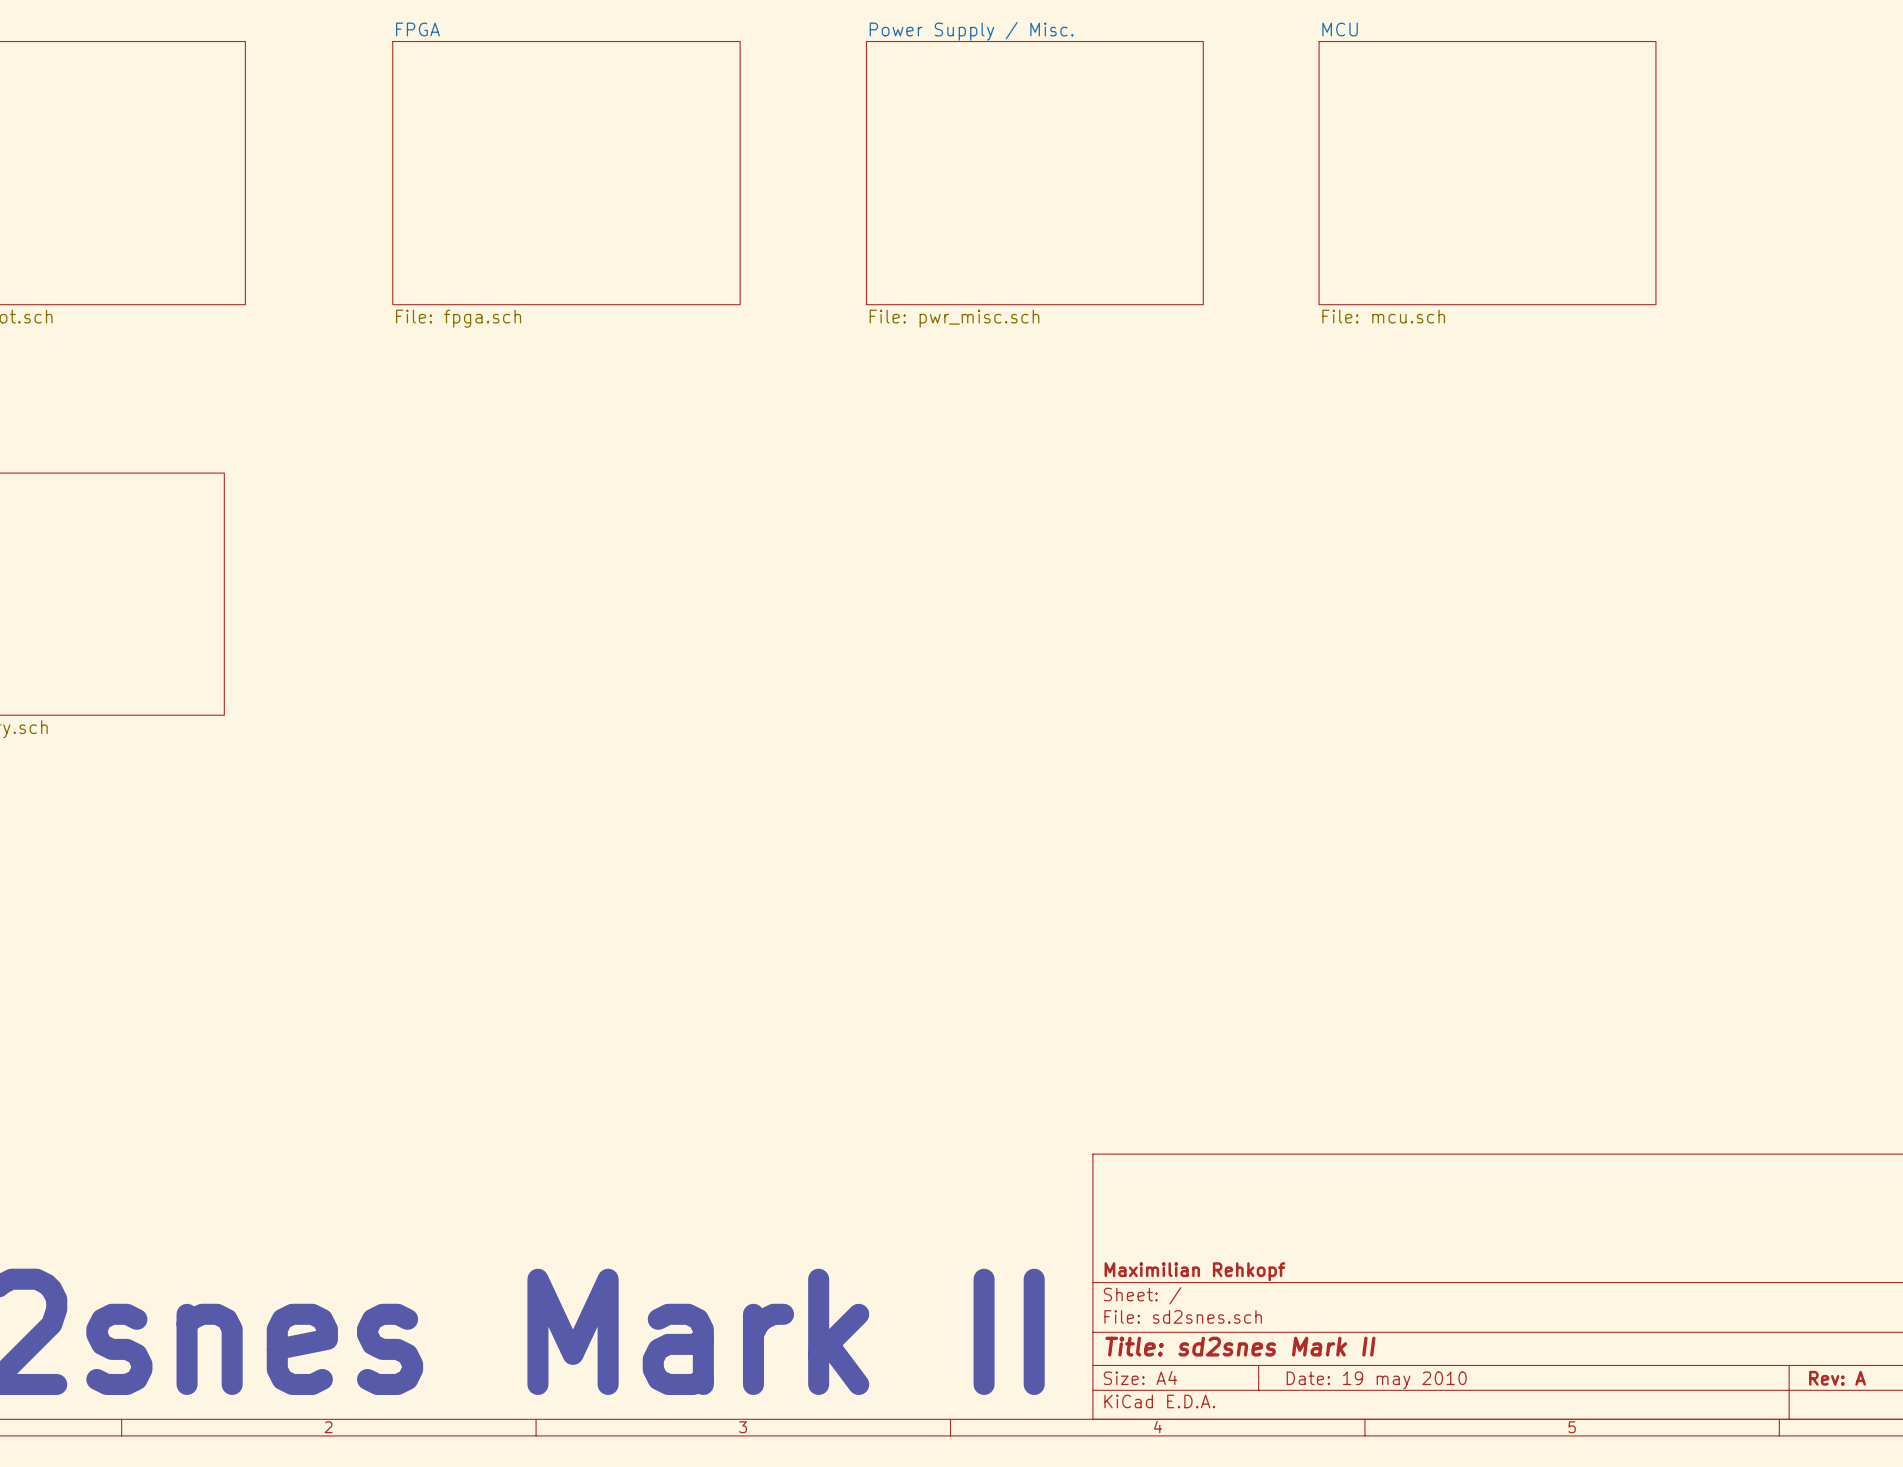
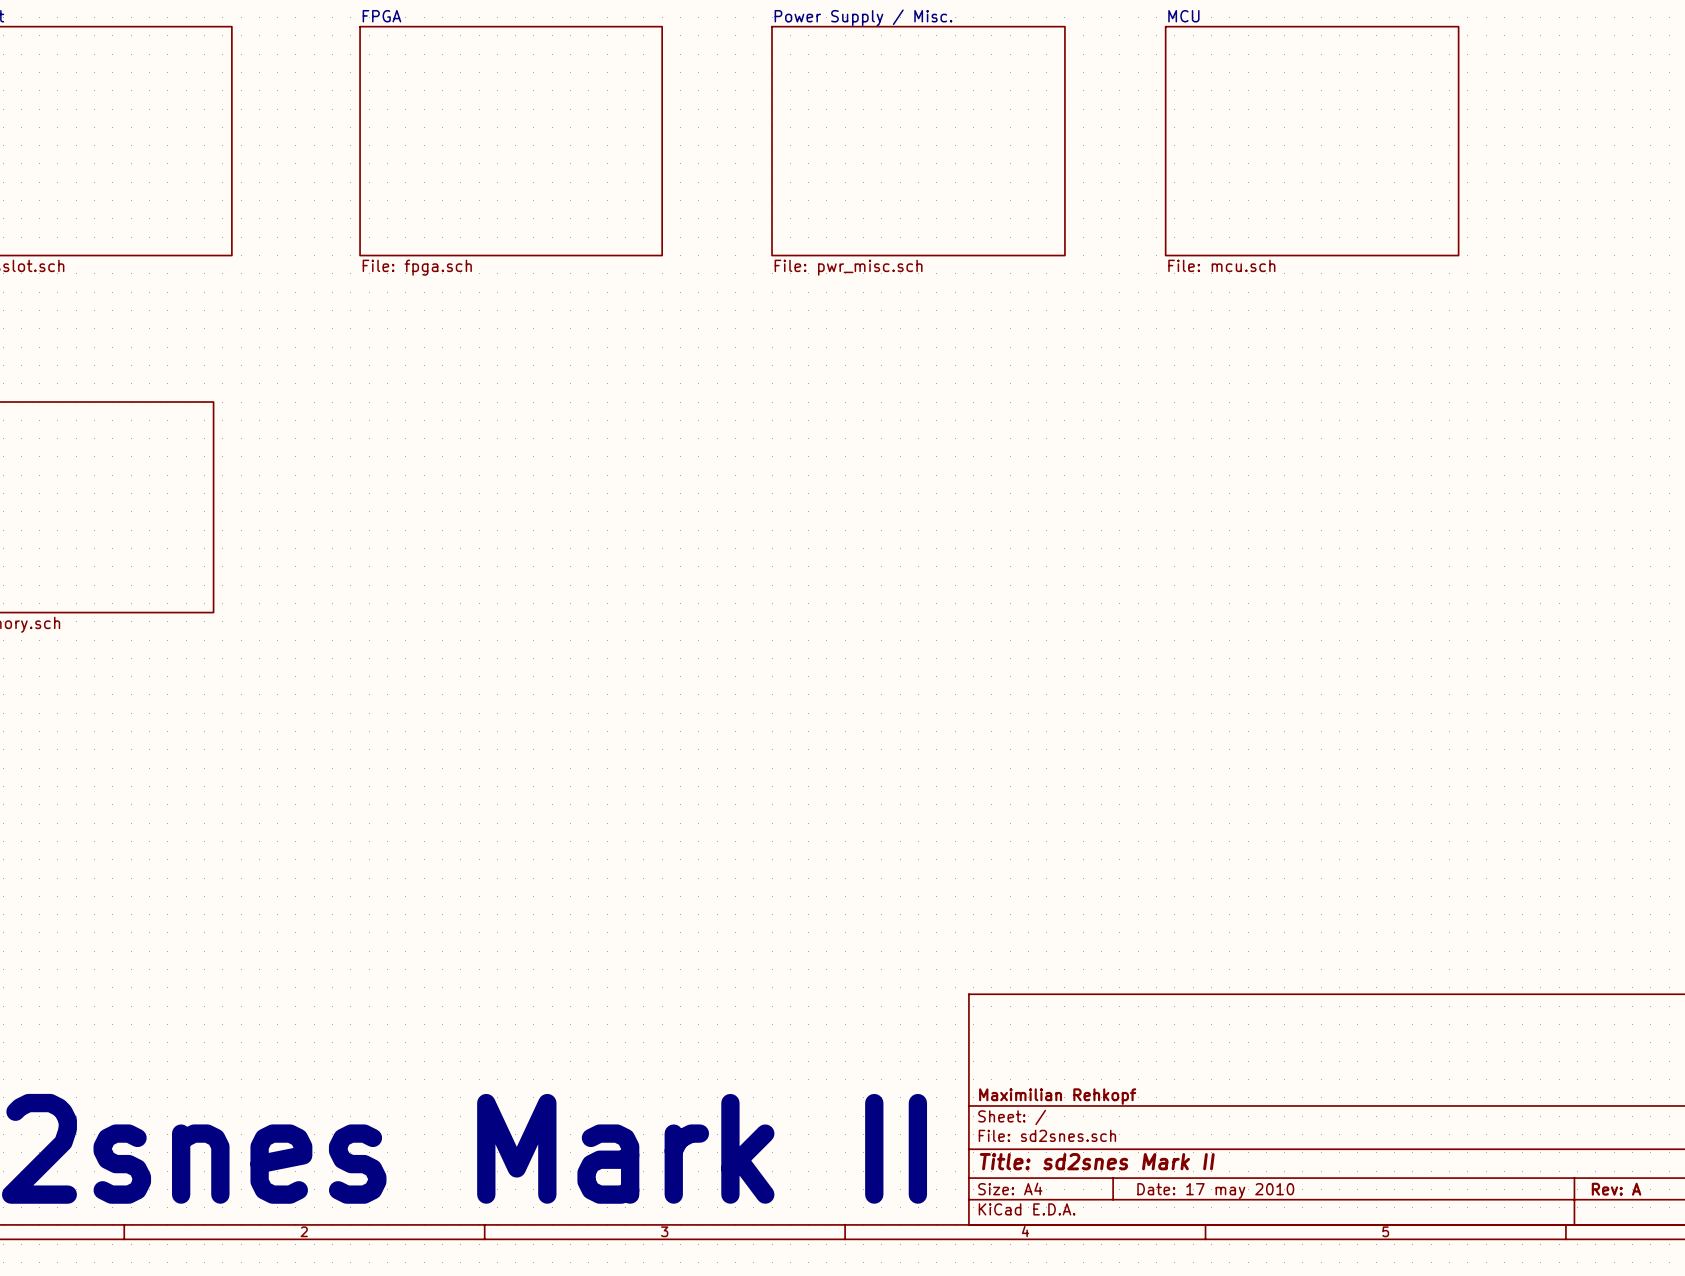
title block: Date: 19 may 2010 (1376, 1380) -> Date: 17 may 2010 (1215, 1191)

